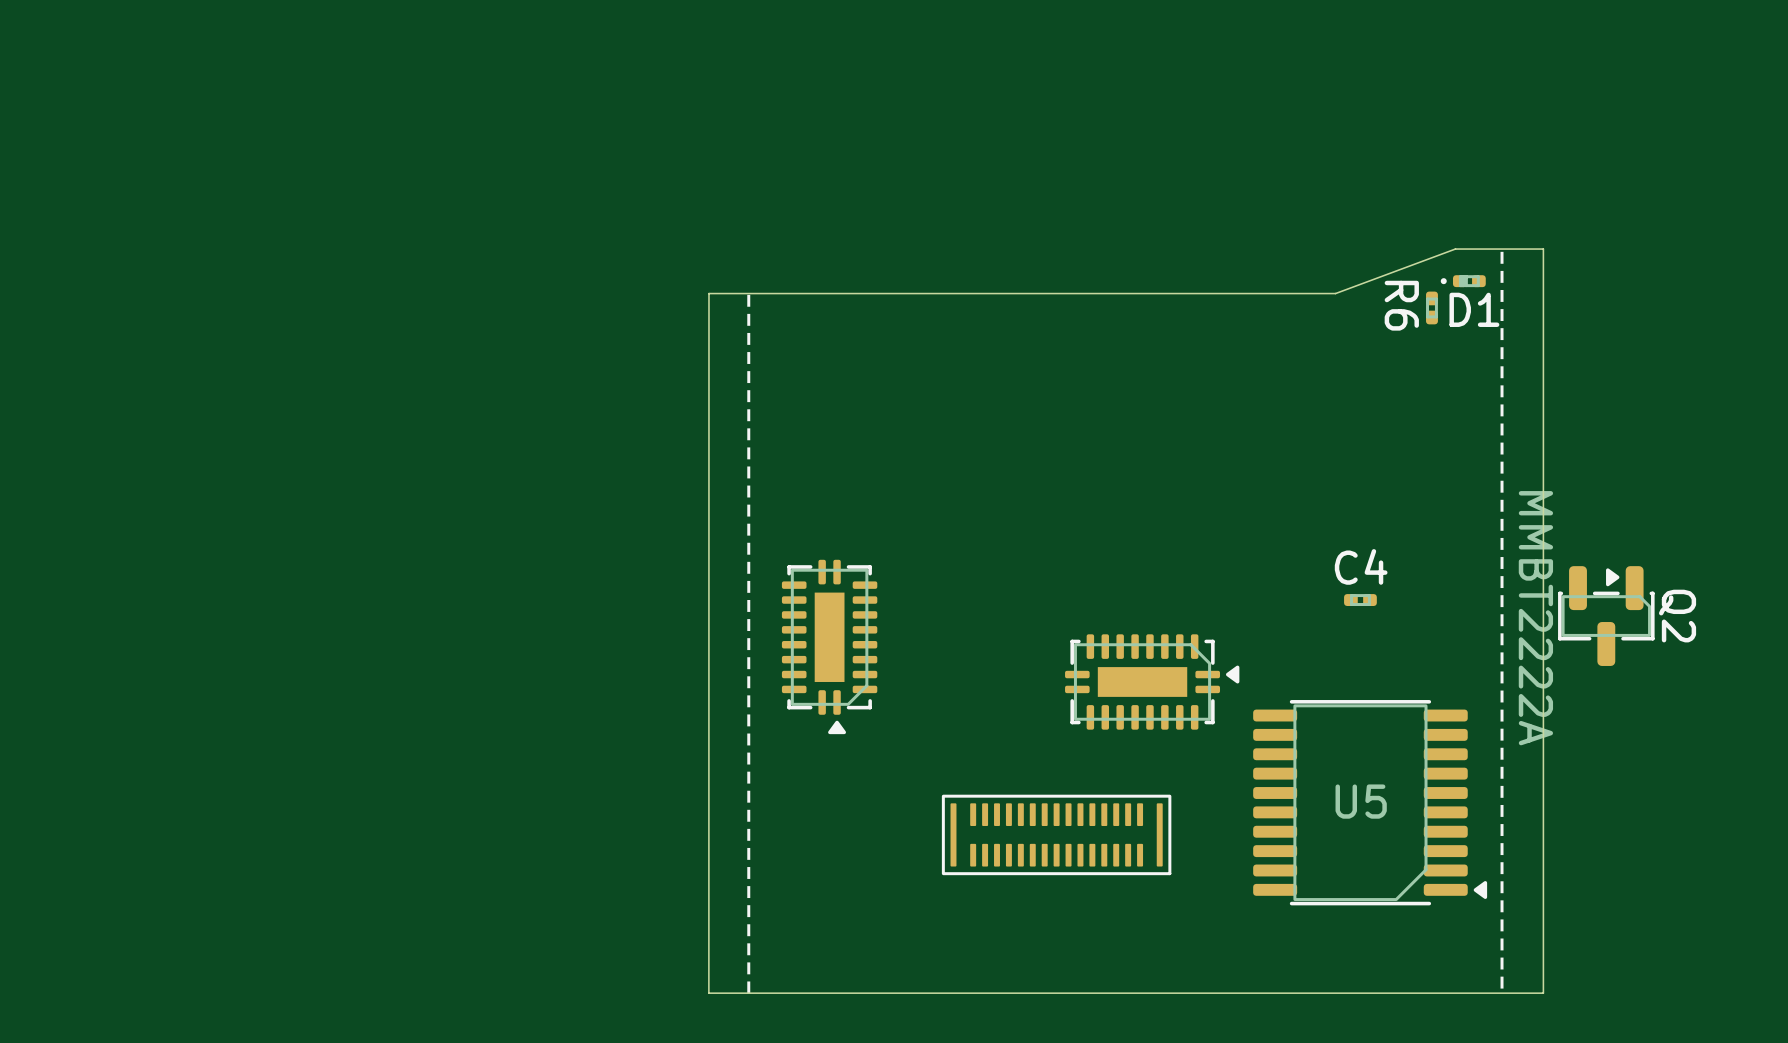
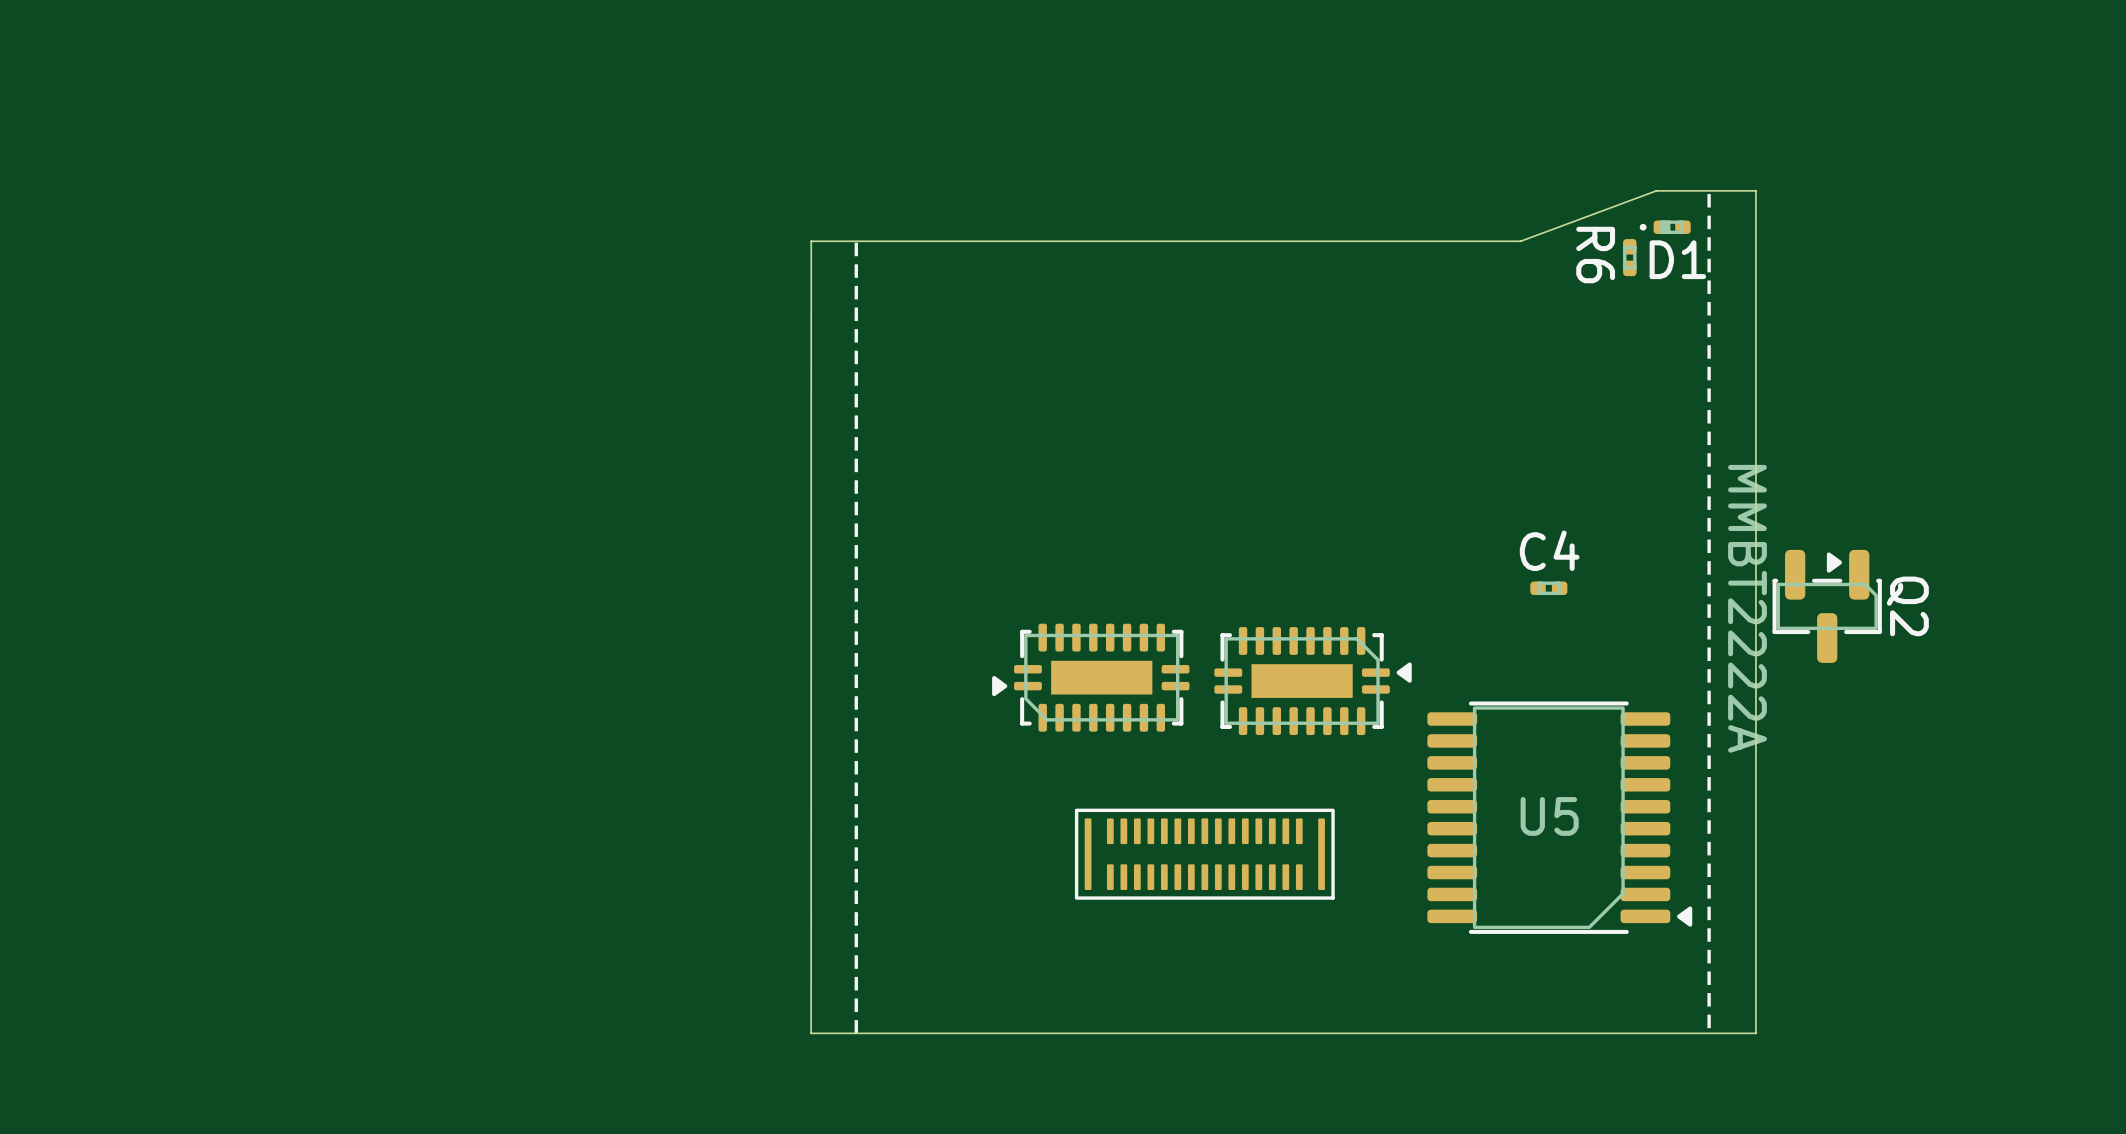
part rotation: 0° (829, 646) -> 90° clockwise (1090, 677)
part position: (829, 646) -> (1090, 677)

